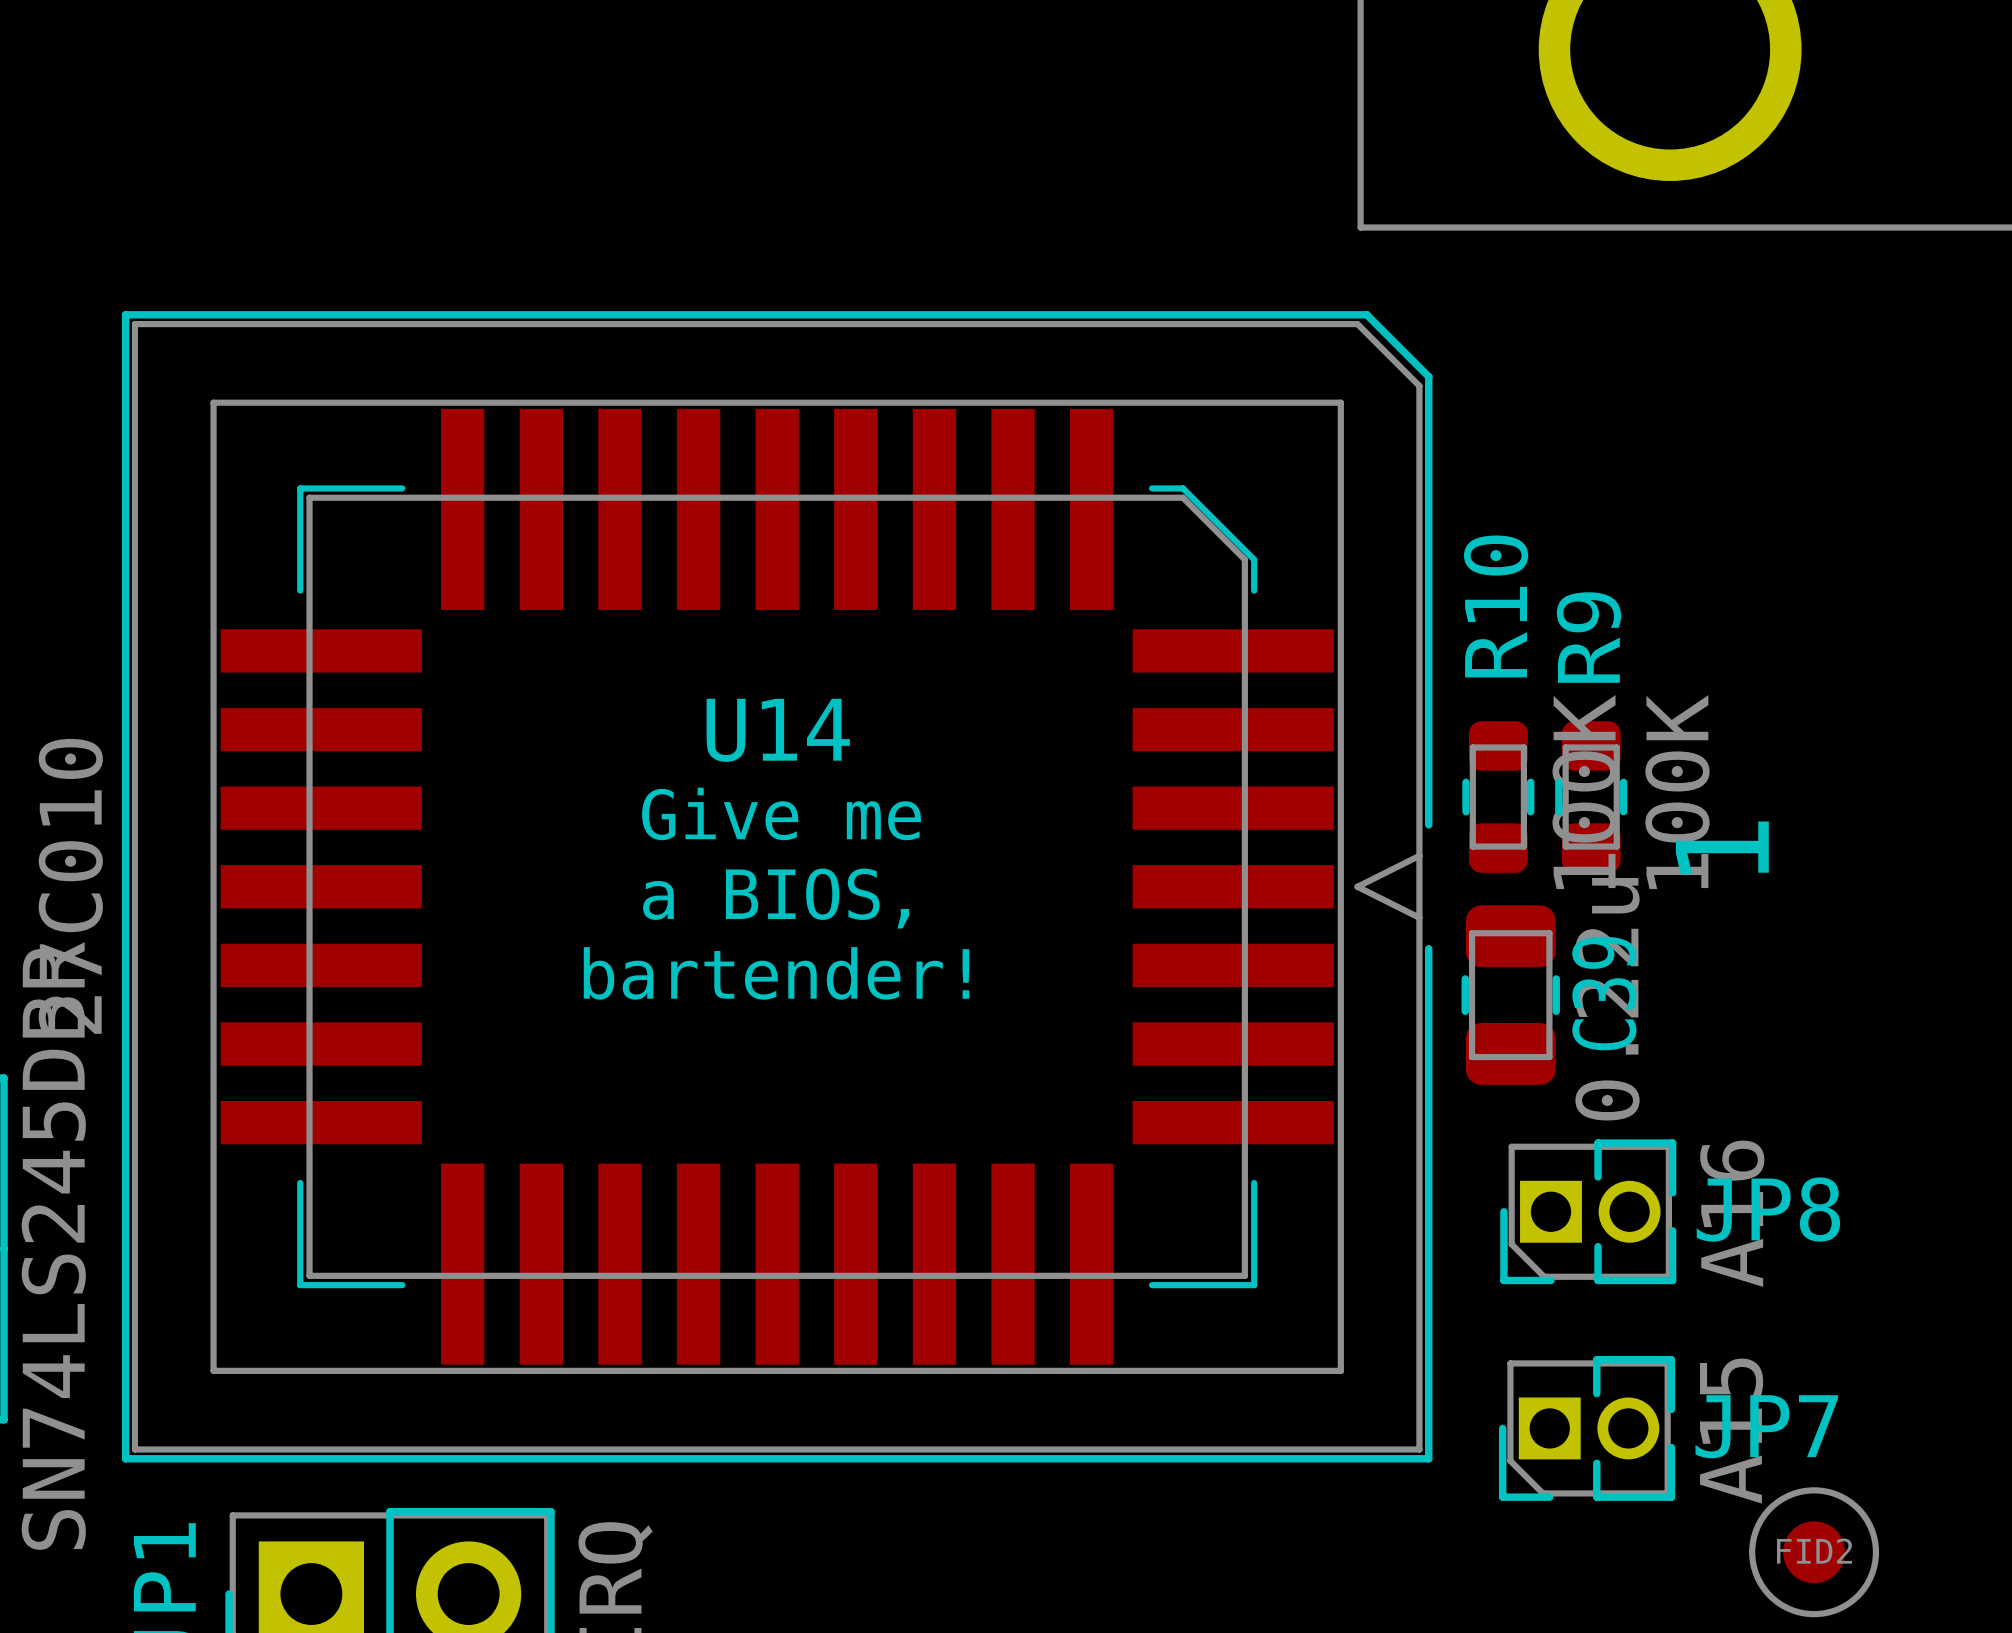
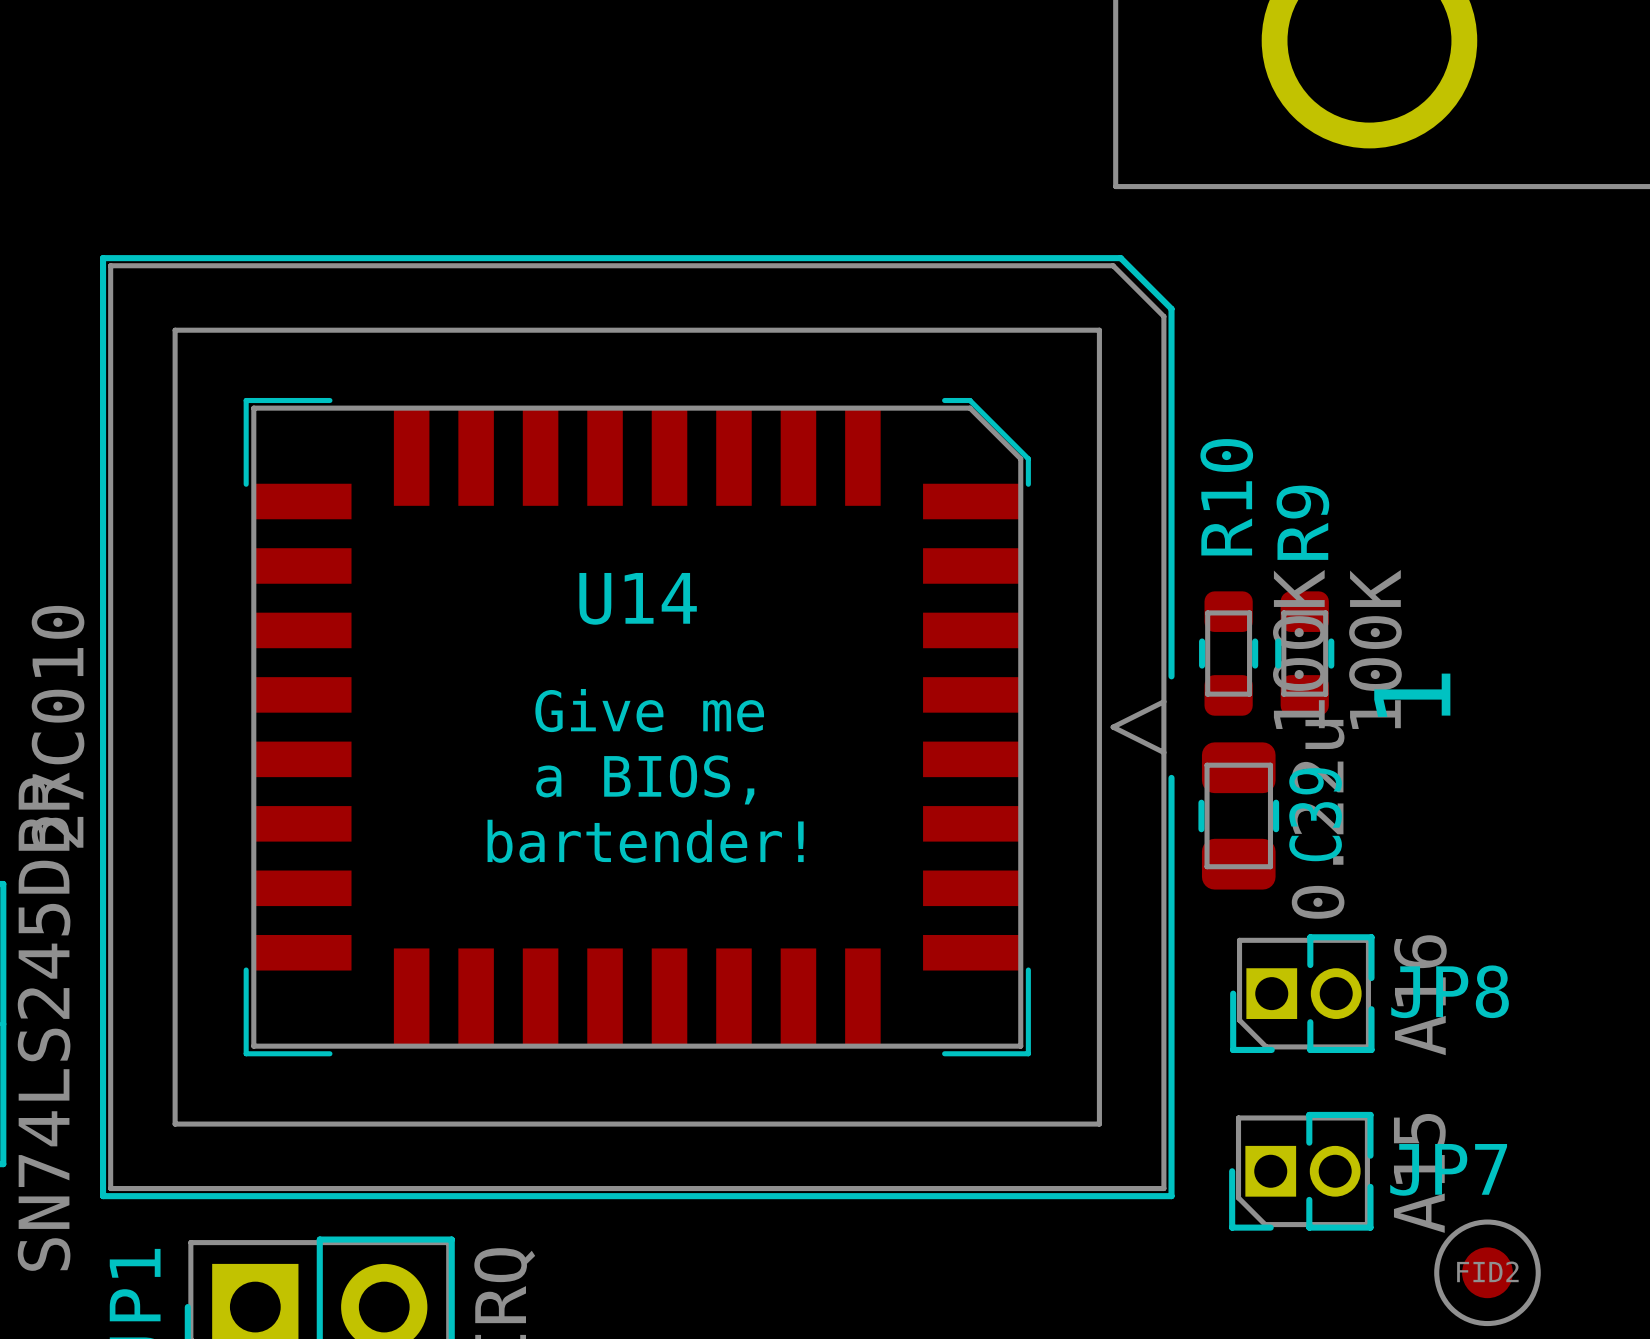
U14 footprint: [121, 311, 1433, 1463] -> [100, 255, 1175, 1200]
text position: Give me (781, 813) -> Give me (649, 710)
text position: a BIOS, (776, 898) -> a BIOS, (645, 779)
text position: bartender! (776, 973) -> bartender! (645, 841)

